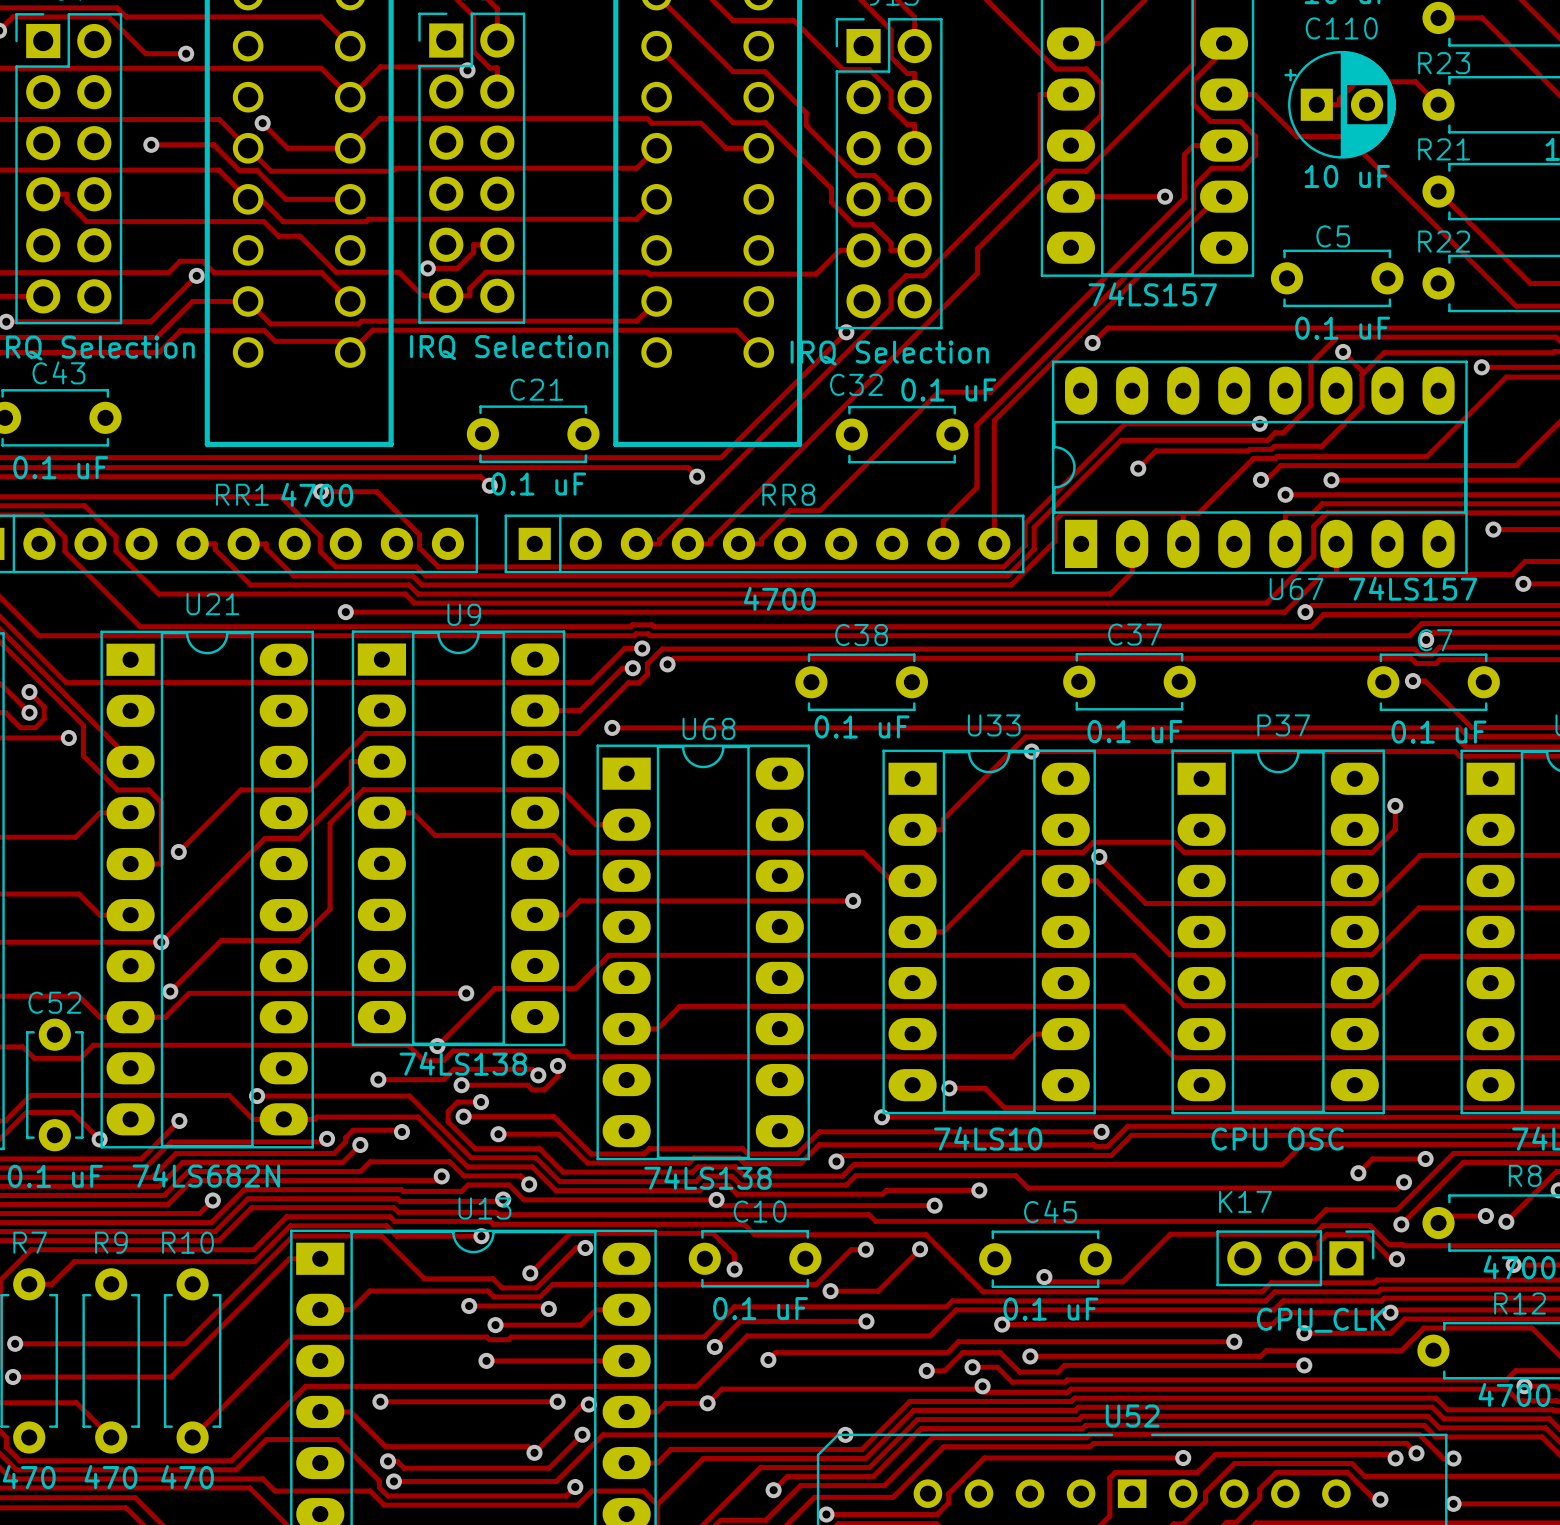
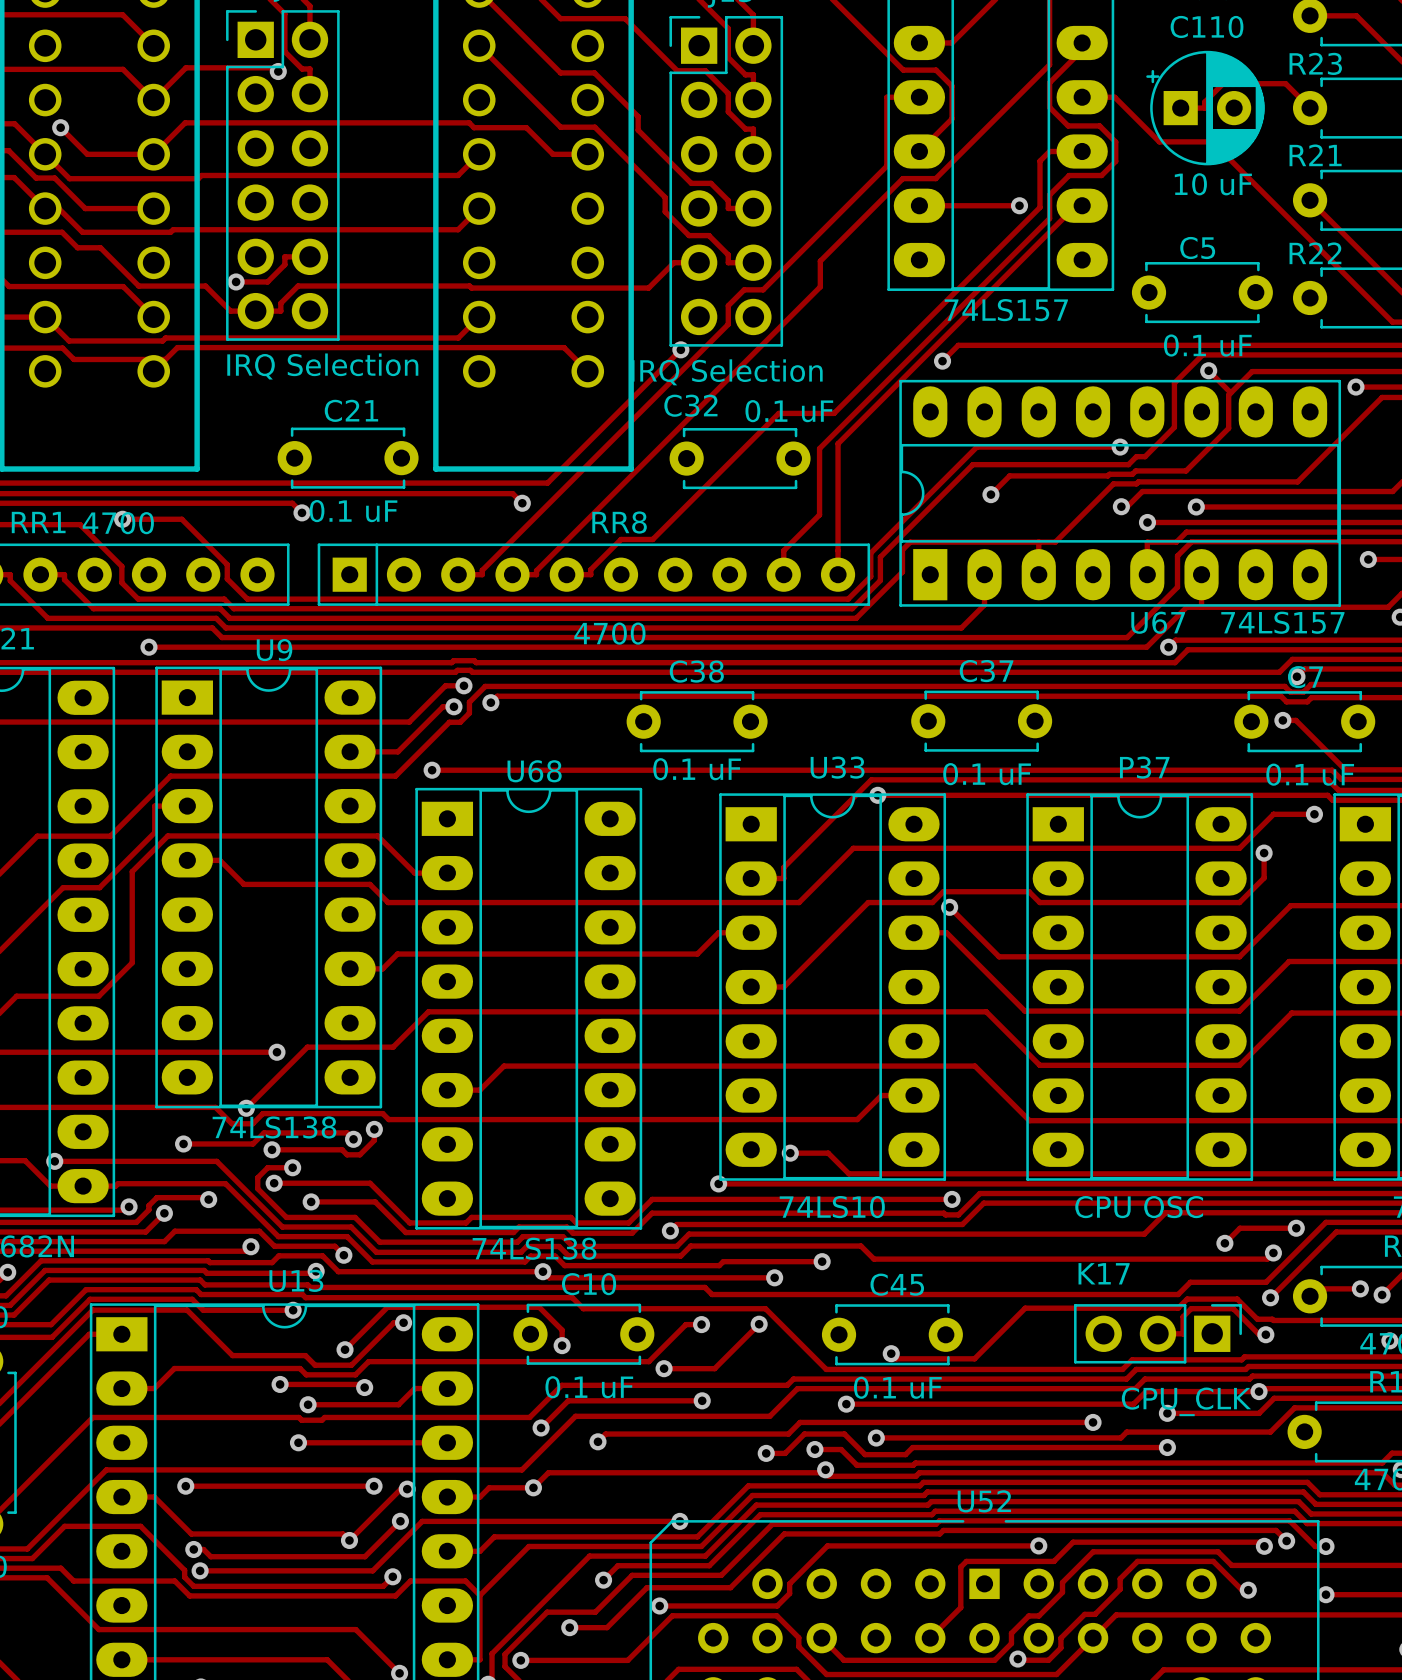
track: none -> (1314, 814) (1273, 814) (1239, 848) (853, 848) (799, 902) (698, 902)
via: none -> (1314, 814)
track: (863, 852) (891, 880) -> (688, 954) (697, 954) (718, 932) (729, 932)
via: (853, 900) -> none

